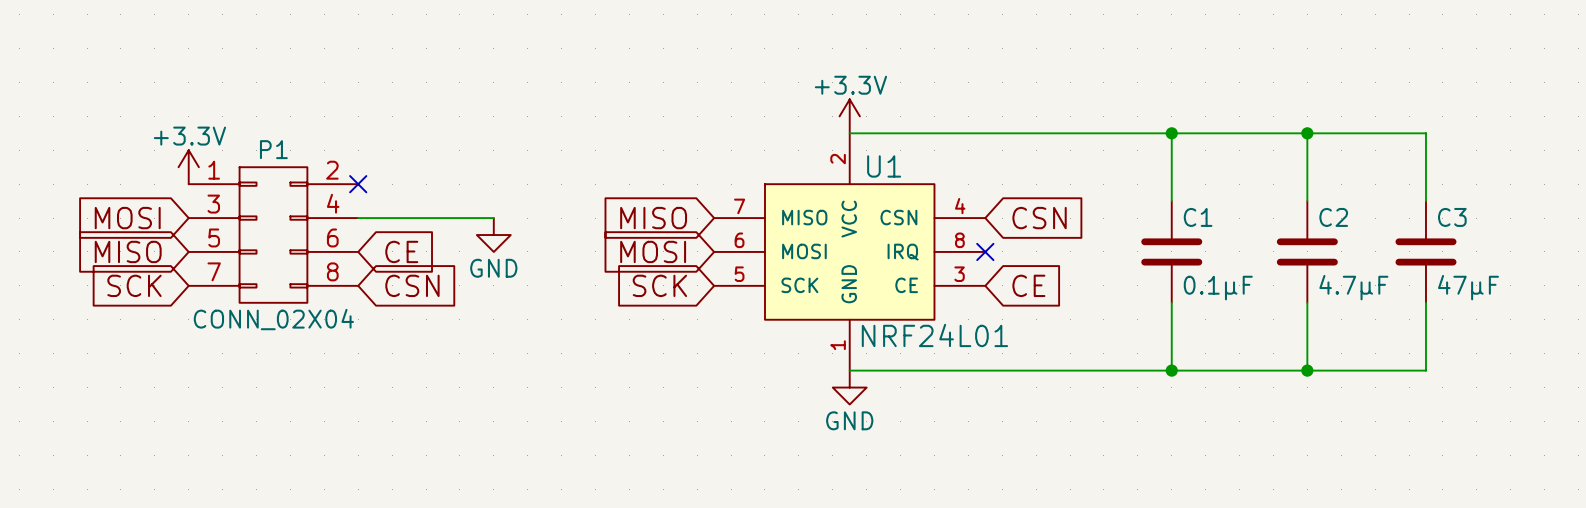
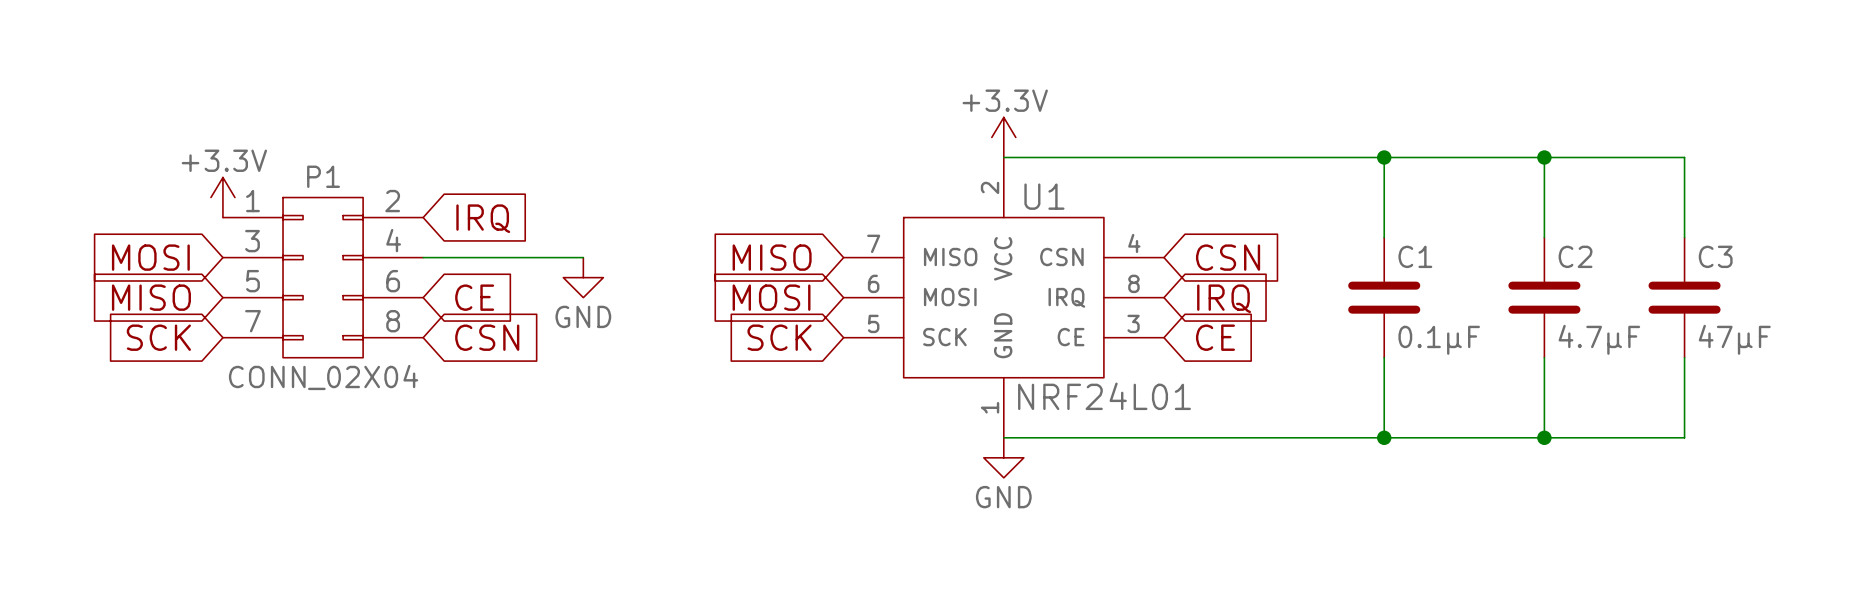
no-connect mark: (358, 184) -> none
global label: none -> IRQ (483, 218)
no-connect mark: (985, 251) -> none
global label: none -> IRQ (1224, 298)

